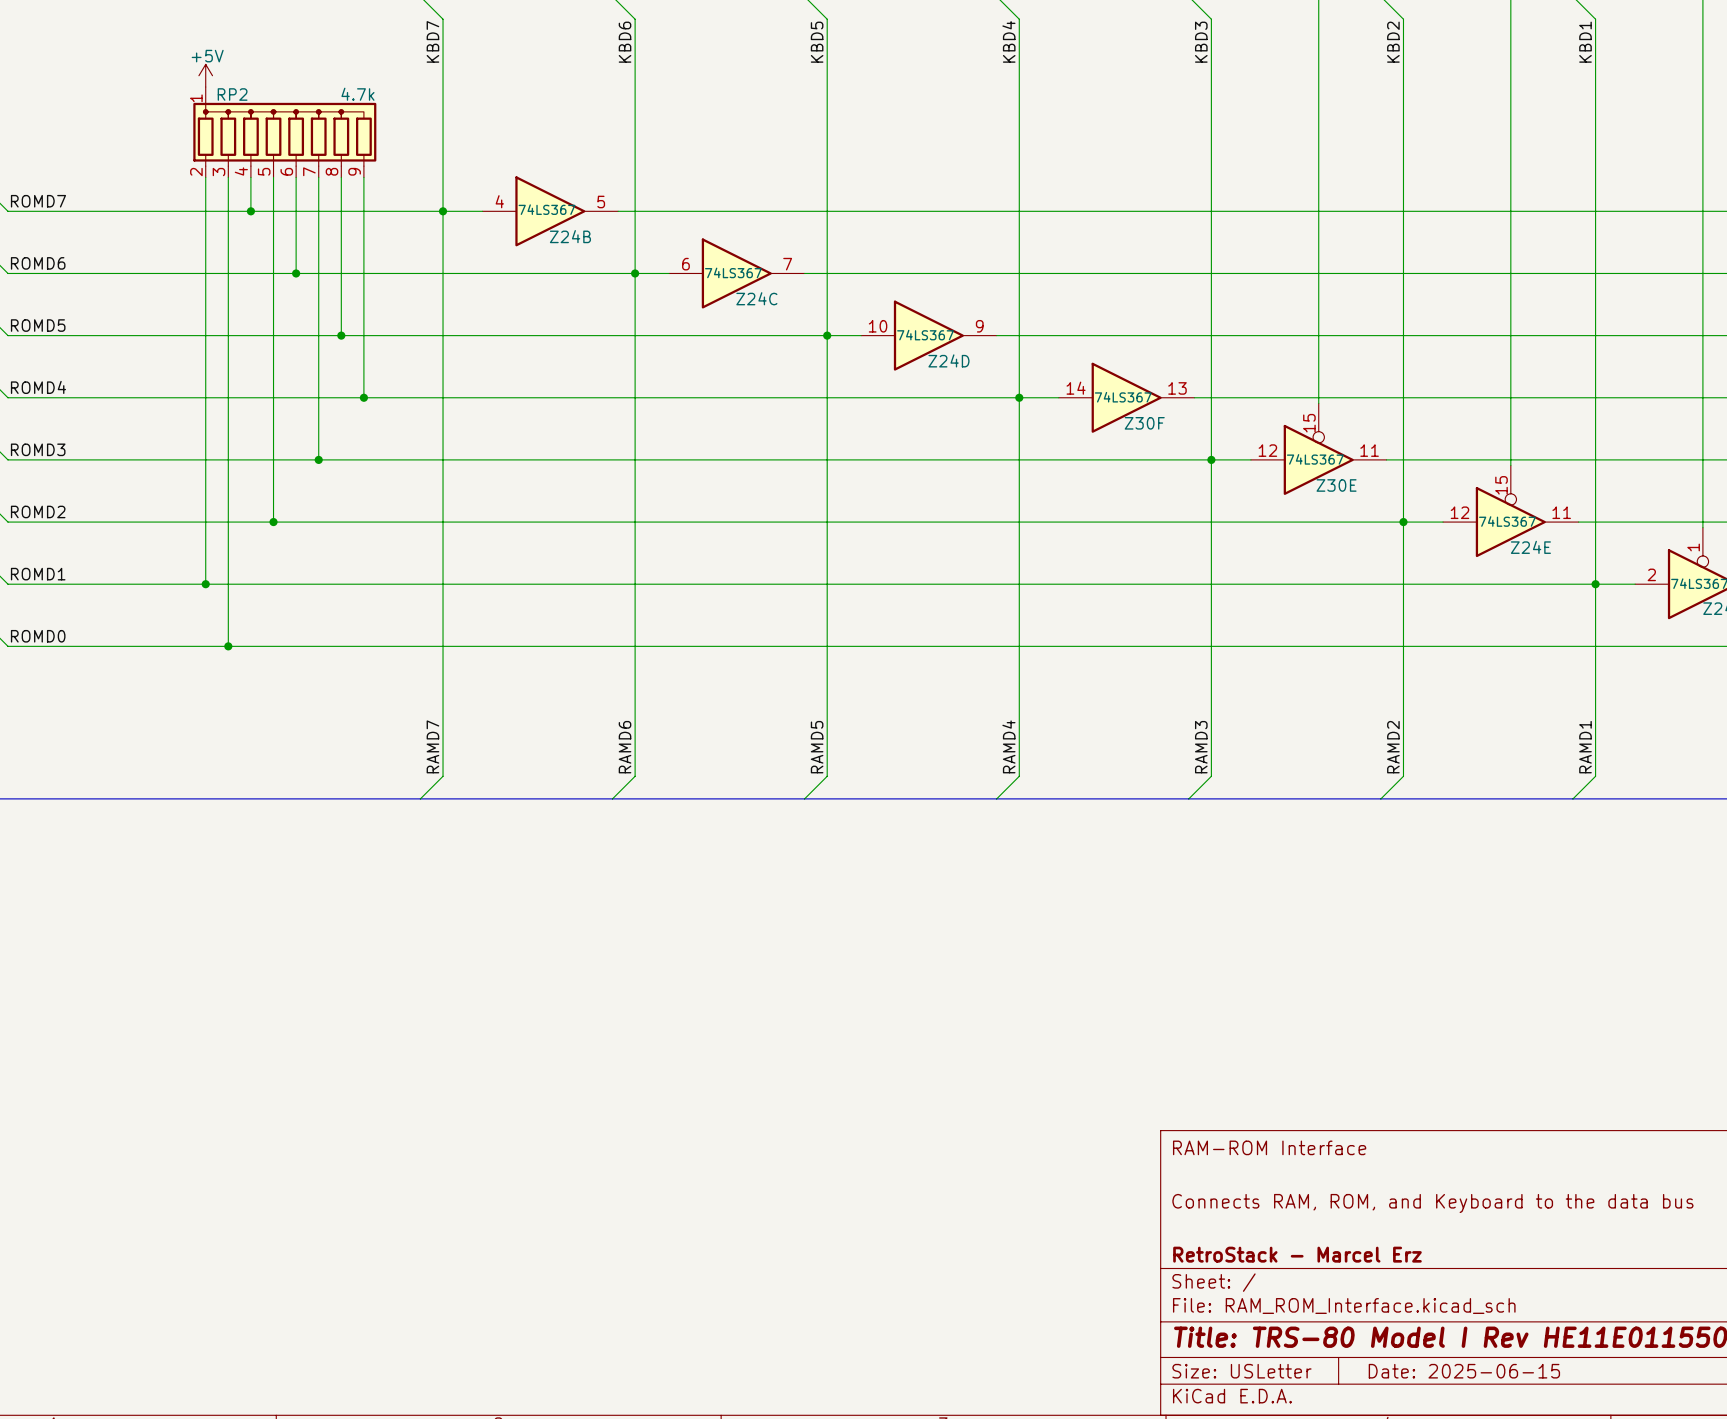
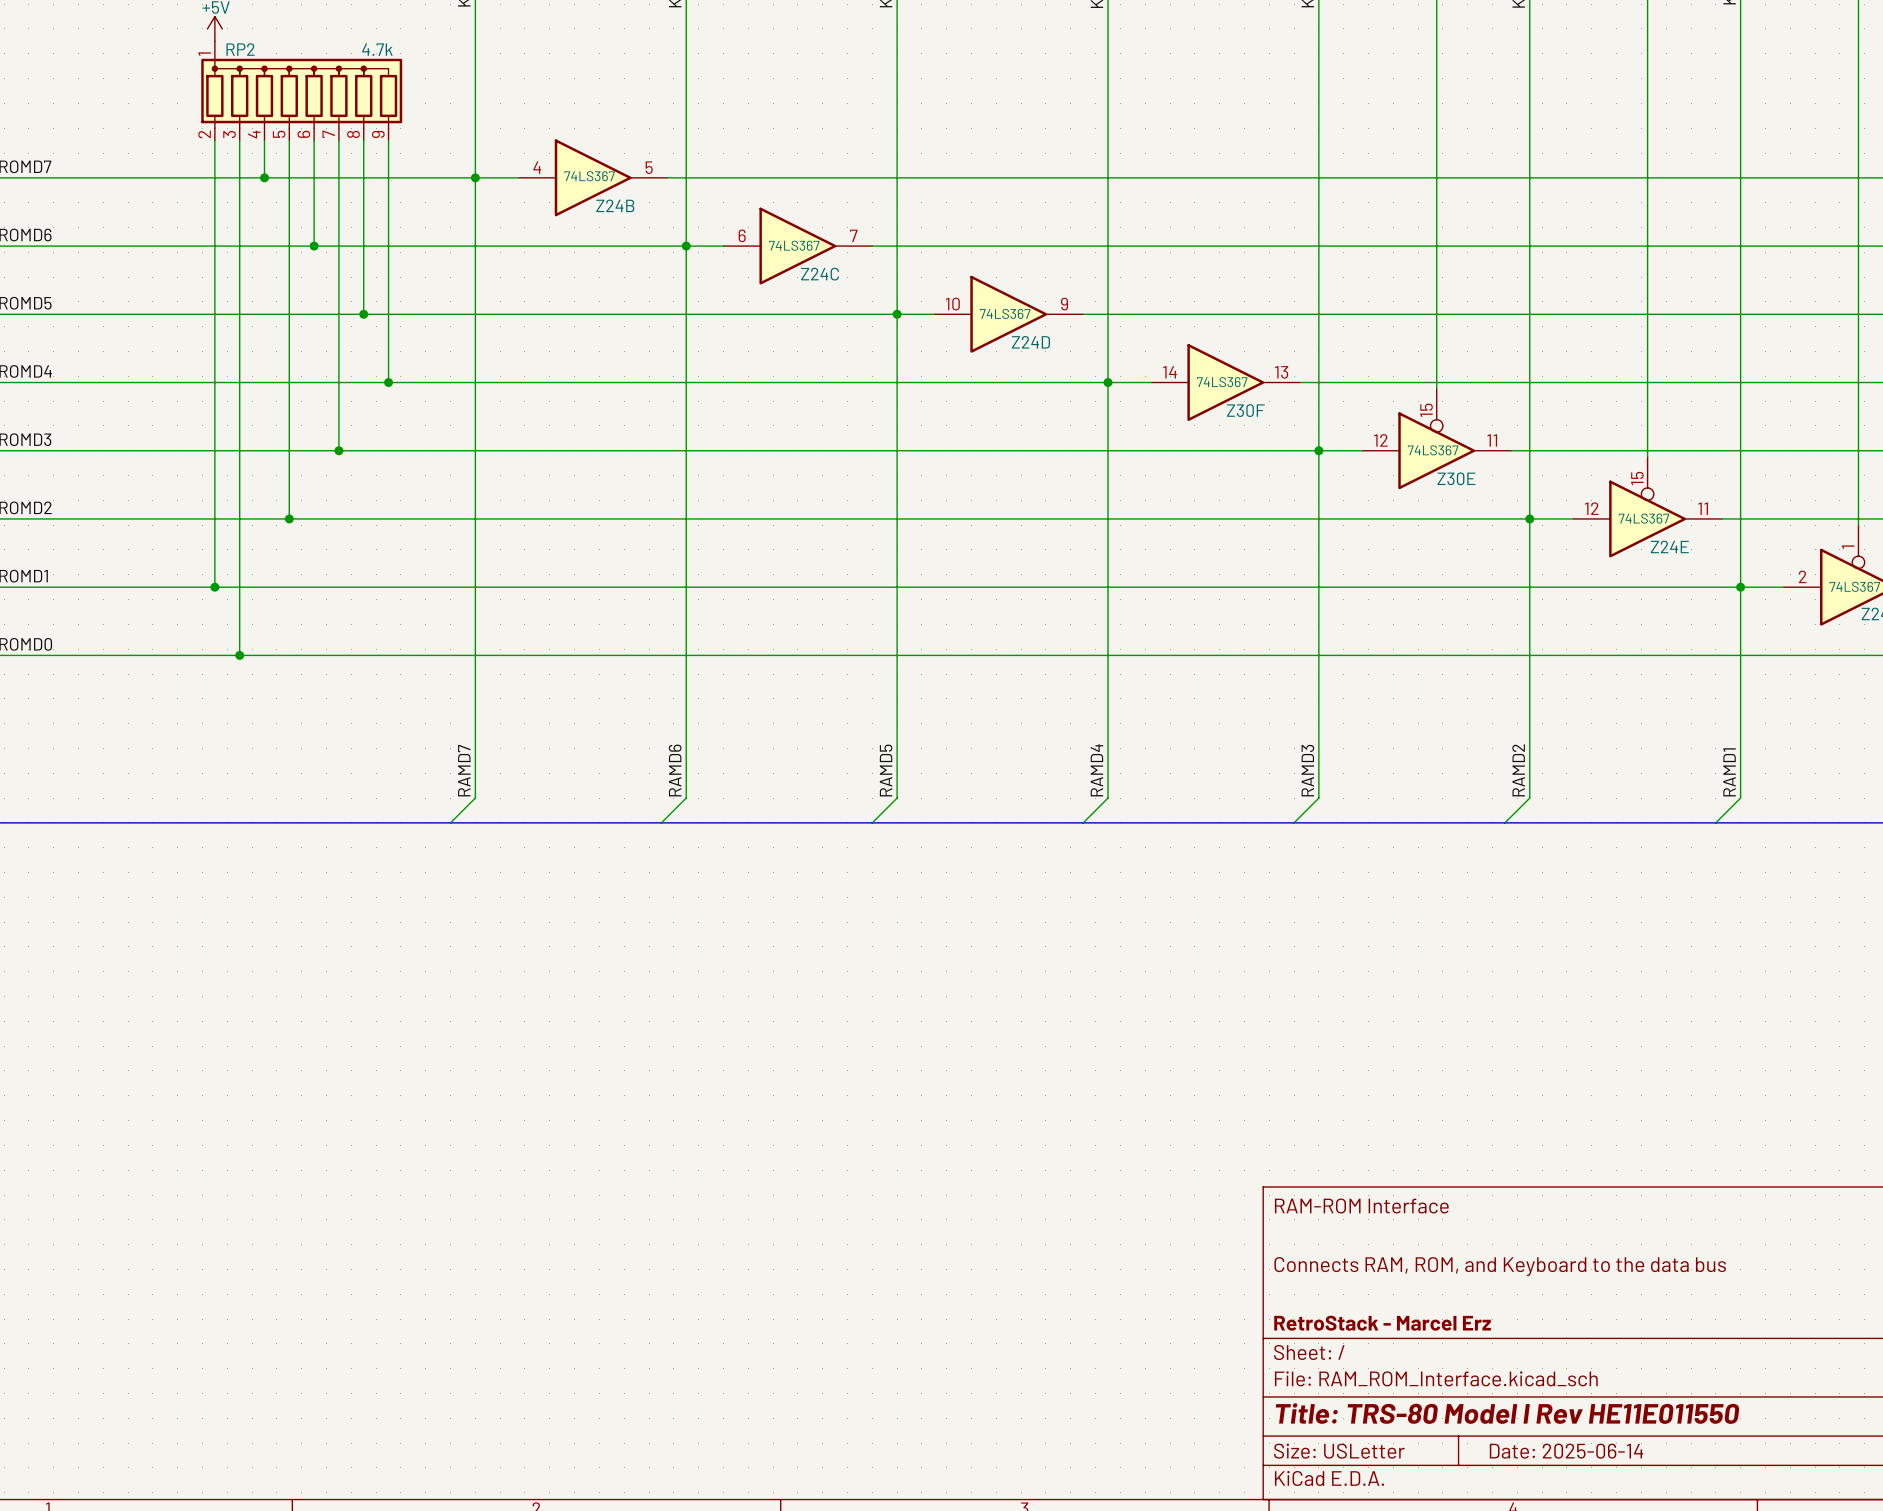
title block: Date: 2025-06-15 (1464, 1371) -> Date: 2025-06-14 (1566, 1451)

